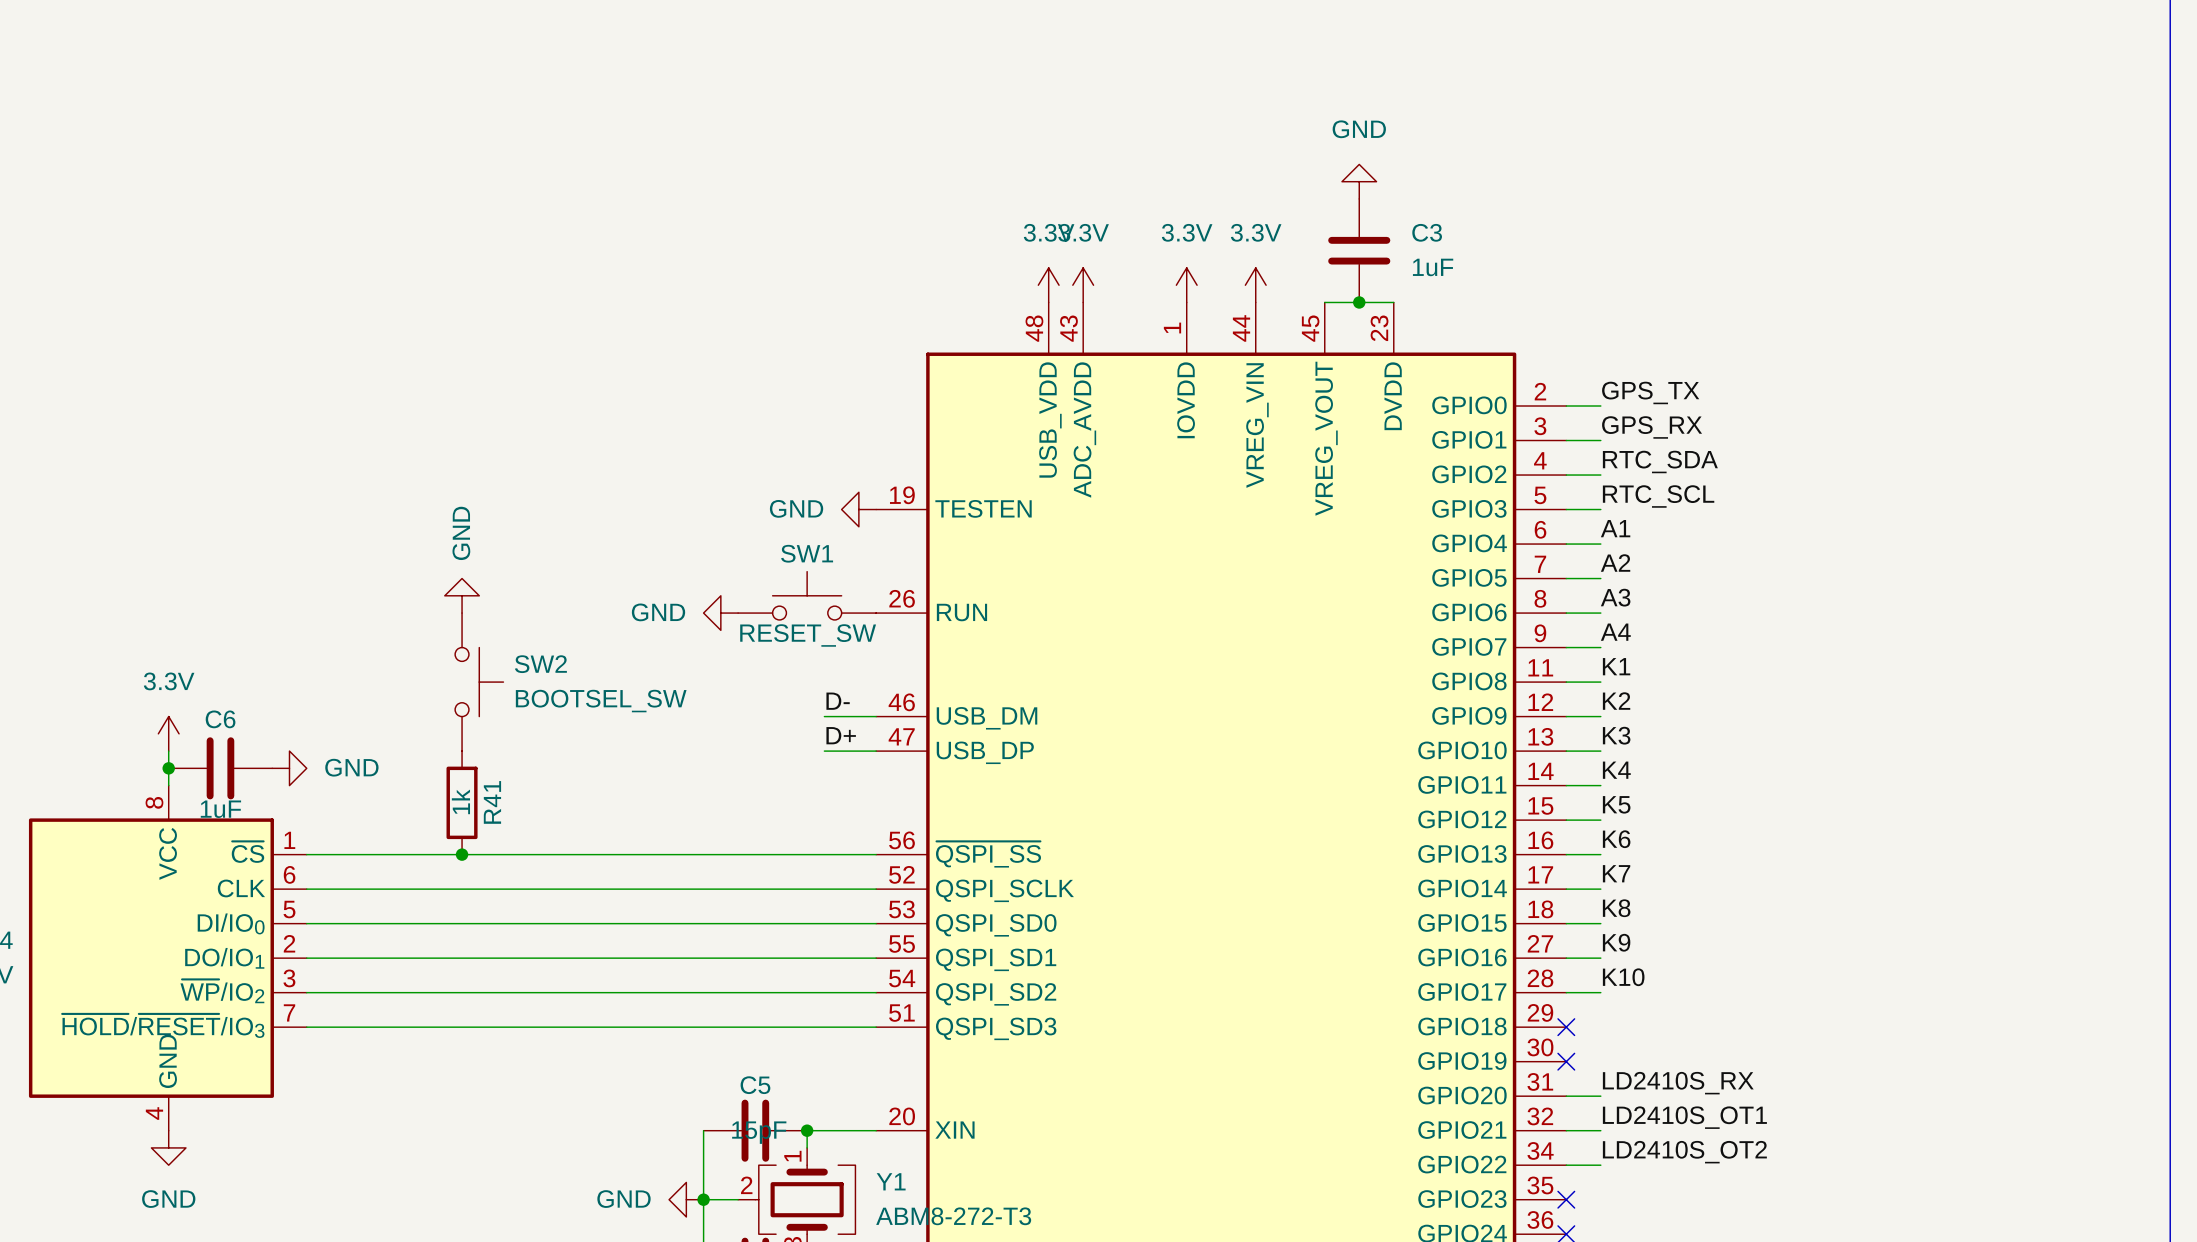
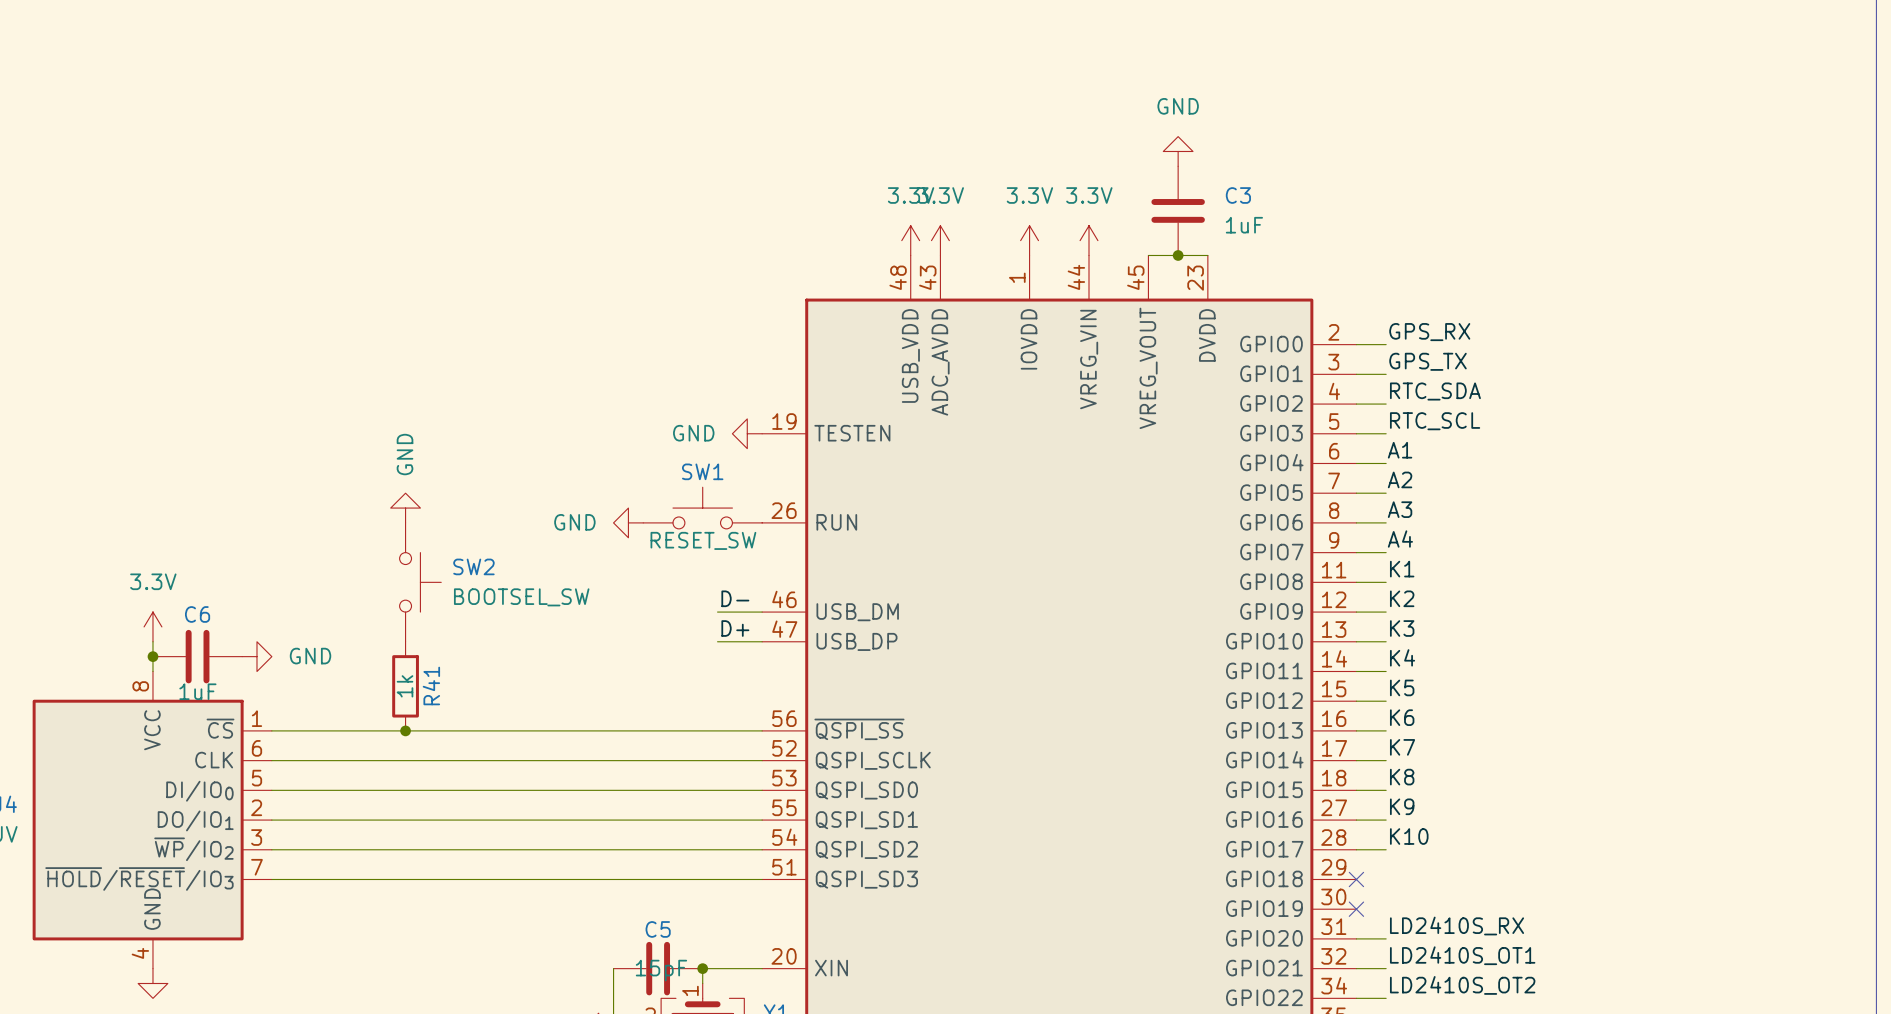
label: GPS_TX (1650, 392) -> GPS_RX (1429, 332)
label: GPS_RX (1652, 427) -> GPS_TX (1428, 361)

